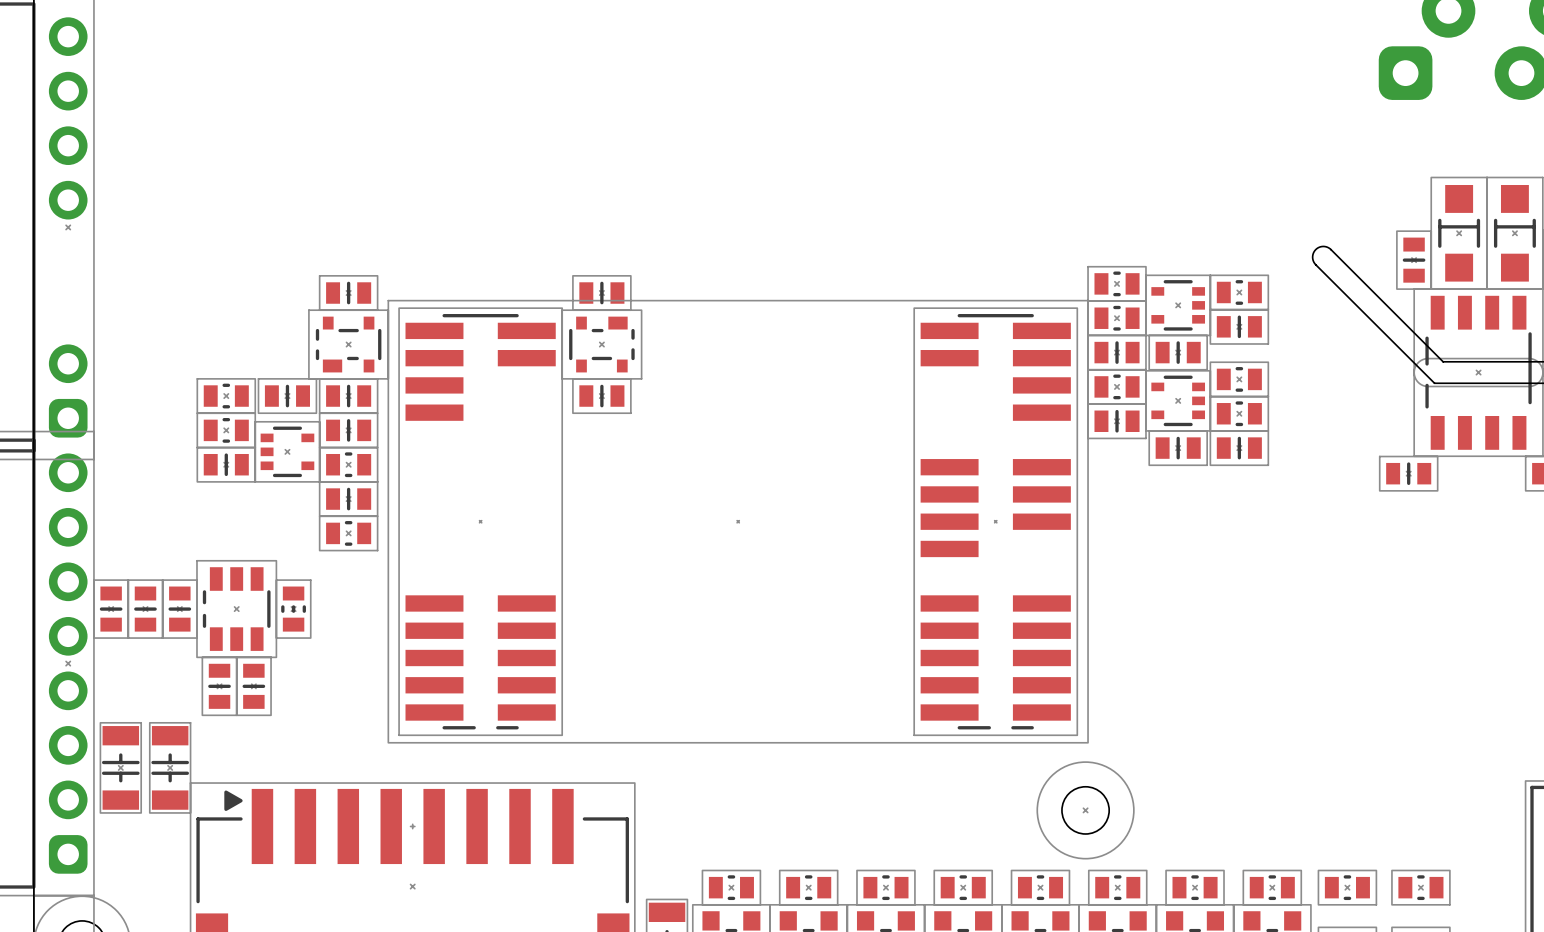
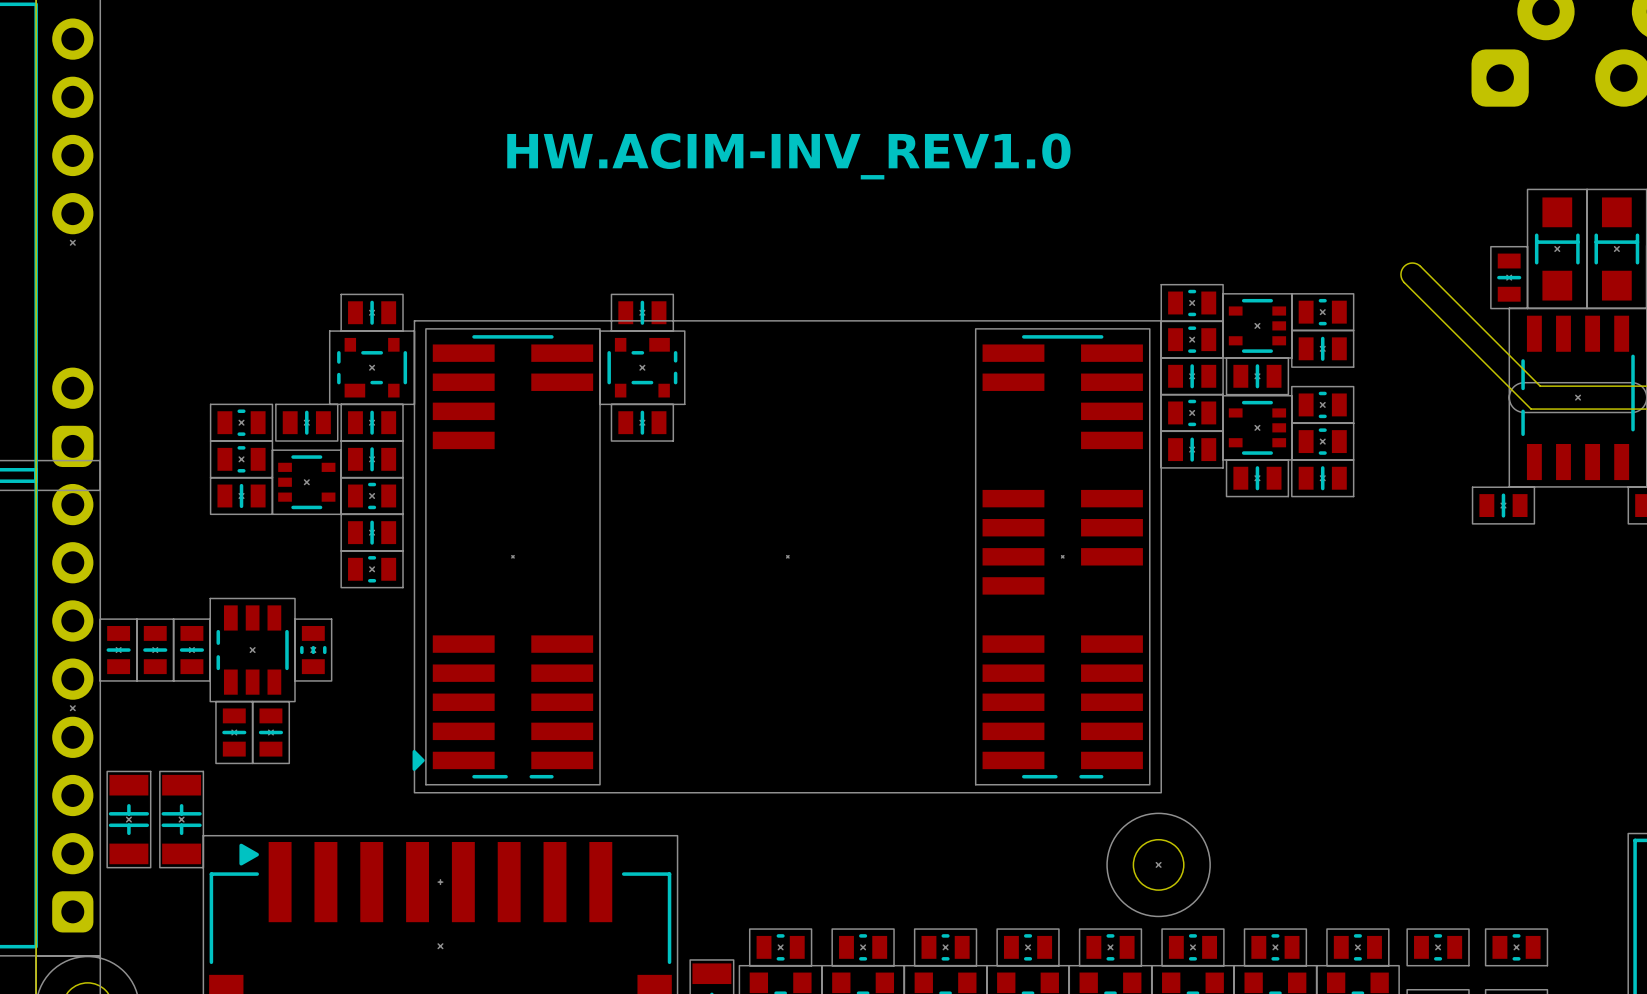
text: none -> HW.ACIM-INV_REV1.0 (788, 156)
drawing: none -> [412, 750, 425, 771]

